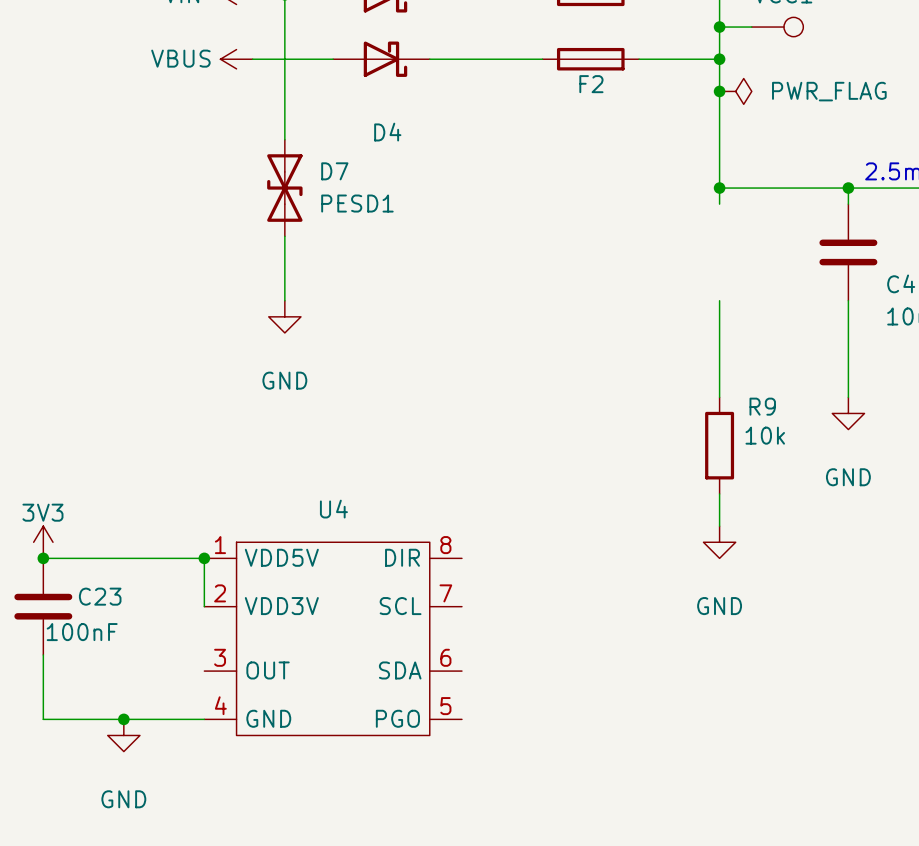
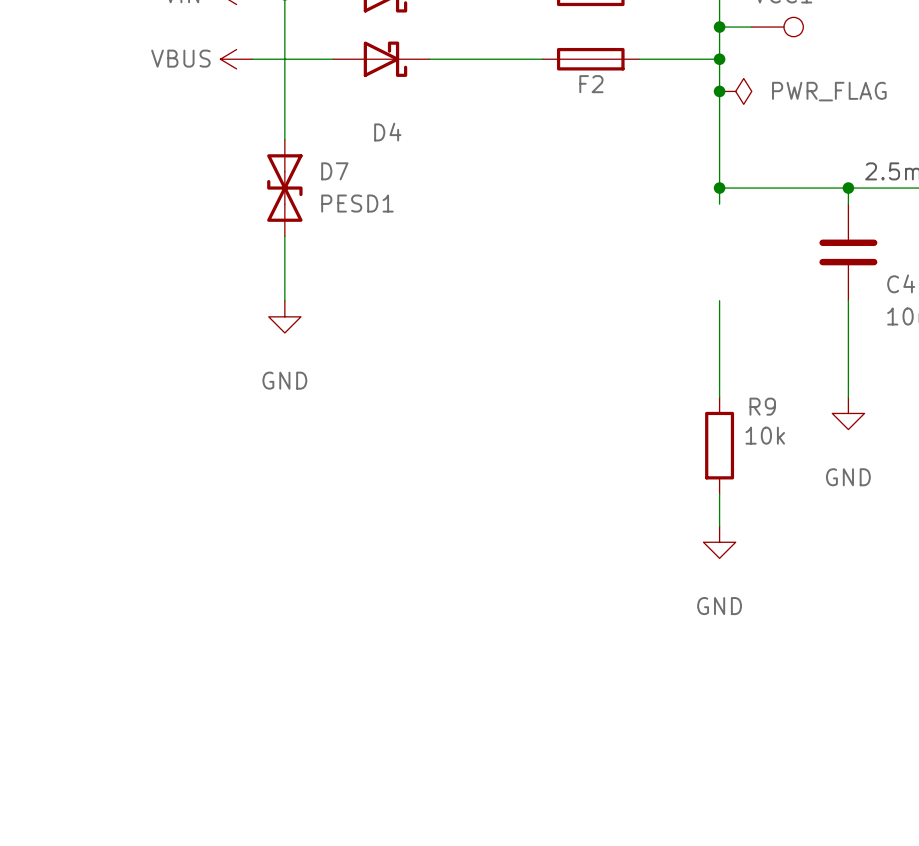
power symbol: 3V3 (43, 542) -> none
wire: (43, 558) (204, 558) (204, 606) -> none
junction: (43, 558) -> none
junction: (204, 558) -> none
C23: 100nF (43, 606) -> none
U4: (333, 638) -> none
wire: (43, 654) (43, 719) (204, 719) -> none
junction: (123, 719) -> none
power symbol: GND (123, 735) -> none

